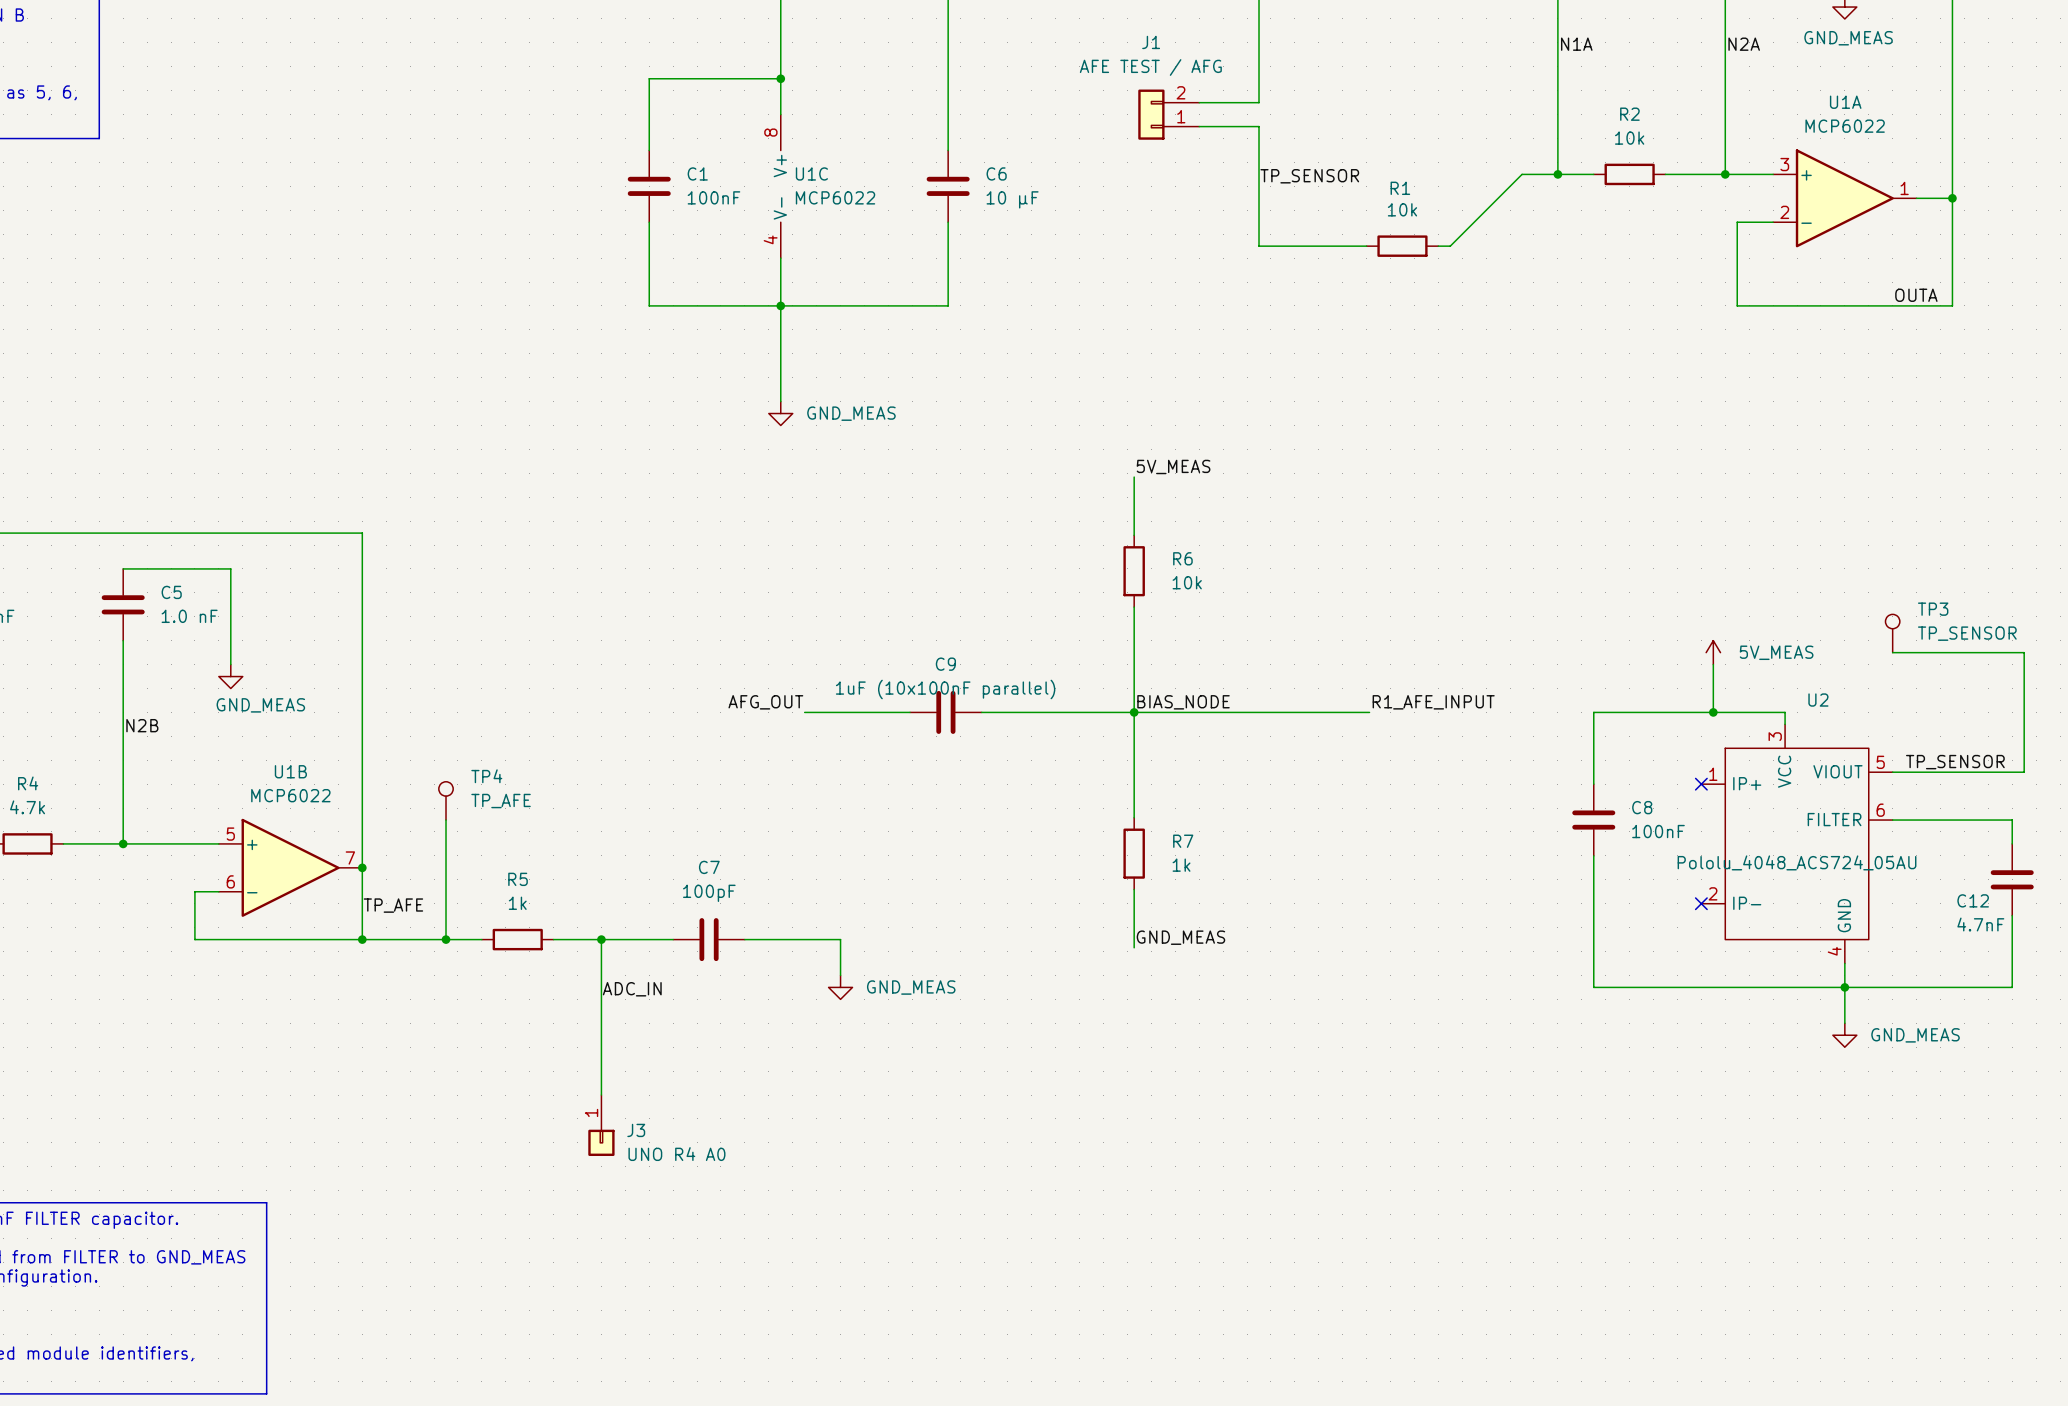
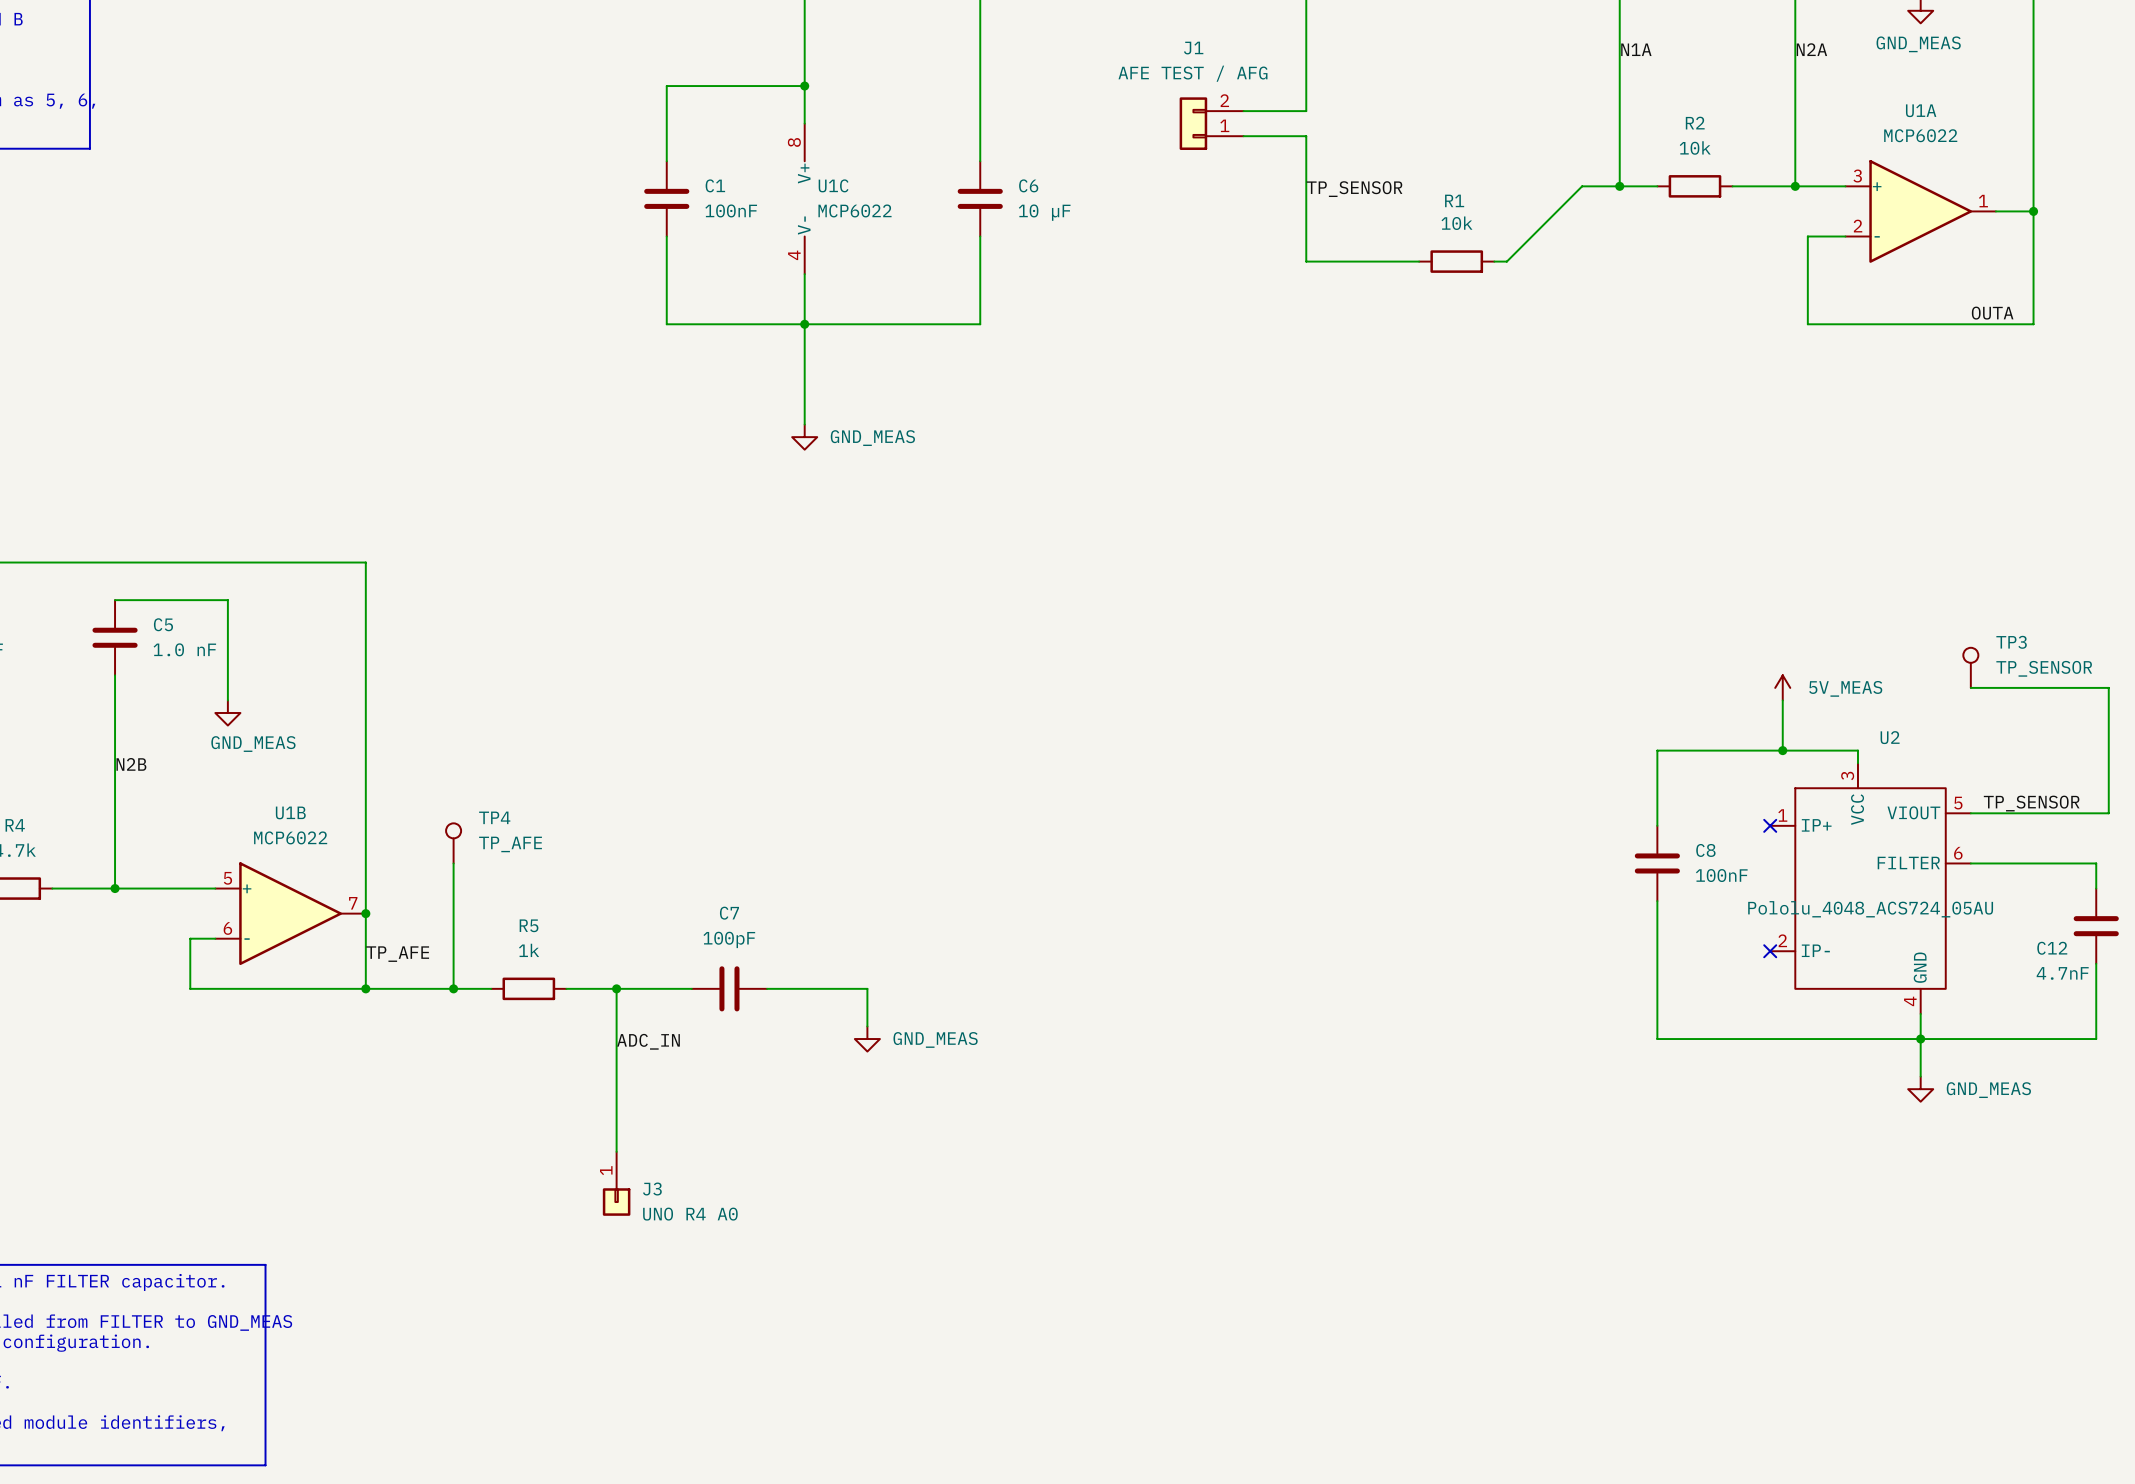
label: 5V_MEAS (1173, 466) -> none
wire: (1134, 477) (1134, 535) -> none
R6: 10k (1134, 571) -> none
wire: (1134, 607) (1134, 817) -> none
label: AFG_OUT (765, 702) -> none
label: BIAS_NODE (1183, 702) -> none
label: R1_AFE_INPUT (1433, 702) -> none
wire: (804, 712) (910, 712) -> none
C9: 1uF (10x100nF parallel) (945, 712) -> none
wire: (981, 712) (1369, 712) -> none
junction: (1134, 712) -> none
R7: 1k (1134, 853) -> none
wire: (1134, 889) (1134, 947) -> none
label: GND_MEAS (1180, 937) -> none

